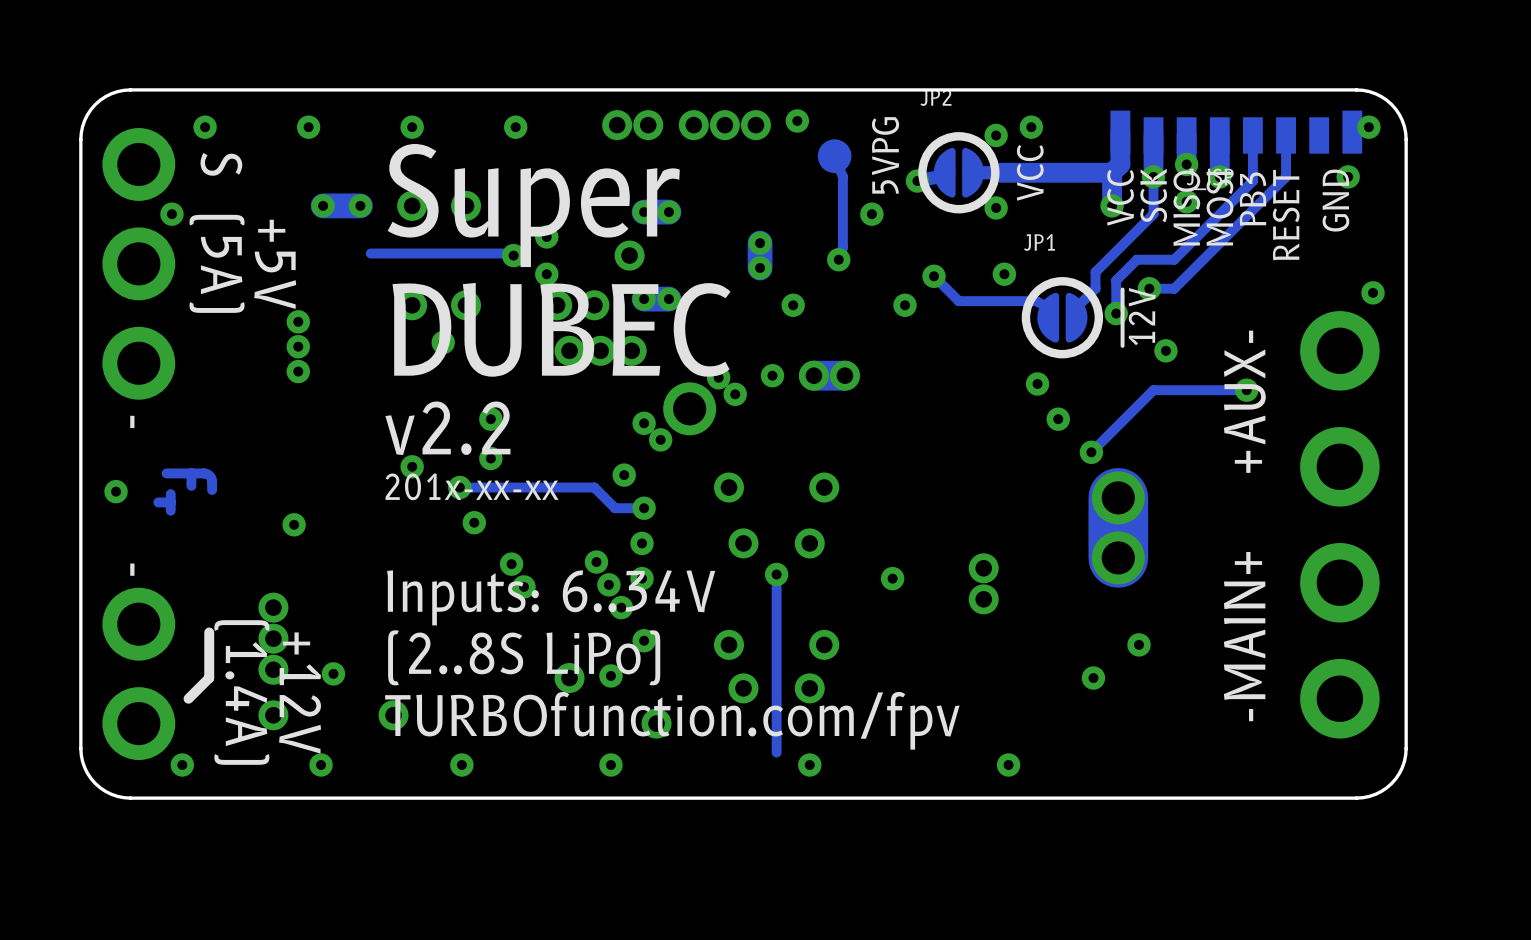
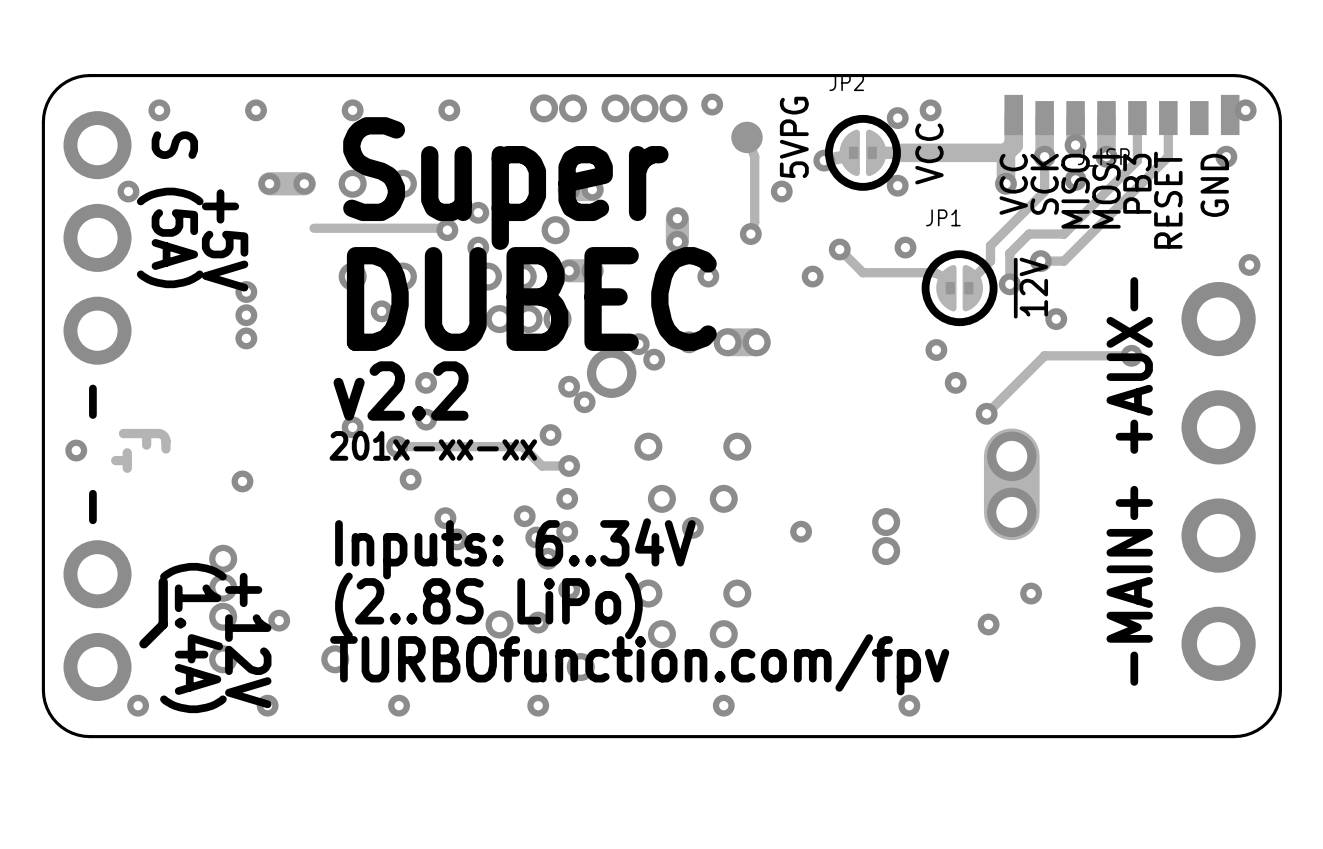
track: (776, 586) (776, 752) -> none

